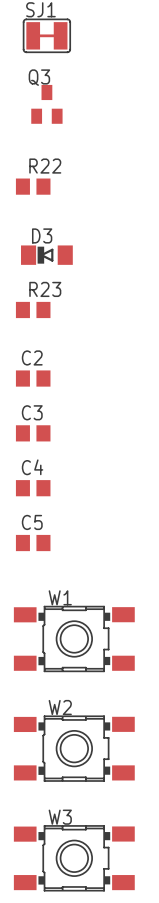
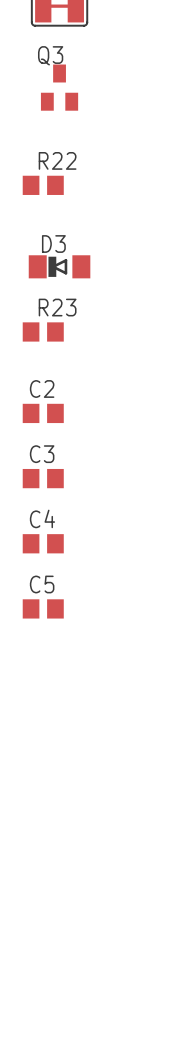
W1: (74, 638) -> none
W2: (74, 748) -> none
W3: (74, 858) -> none

